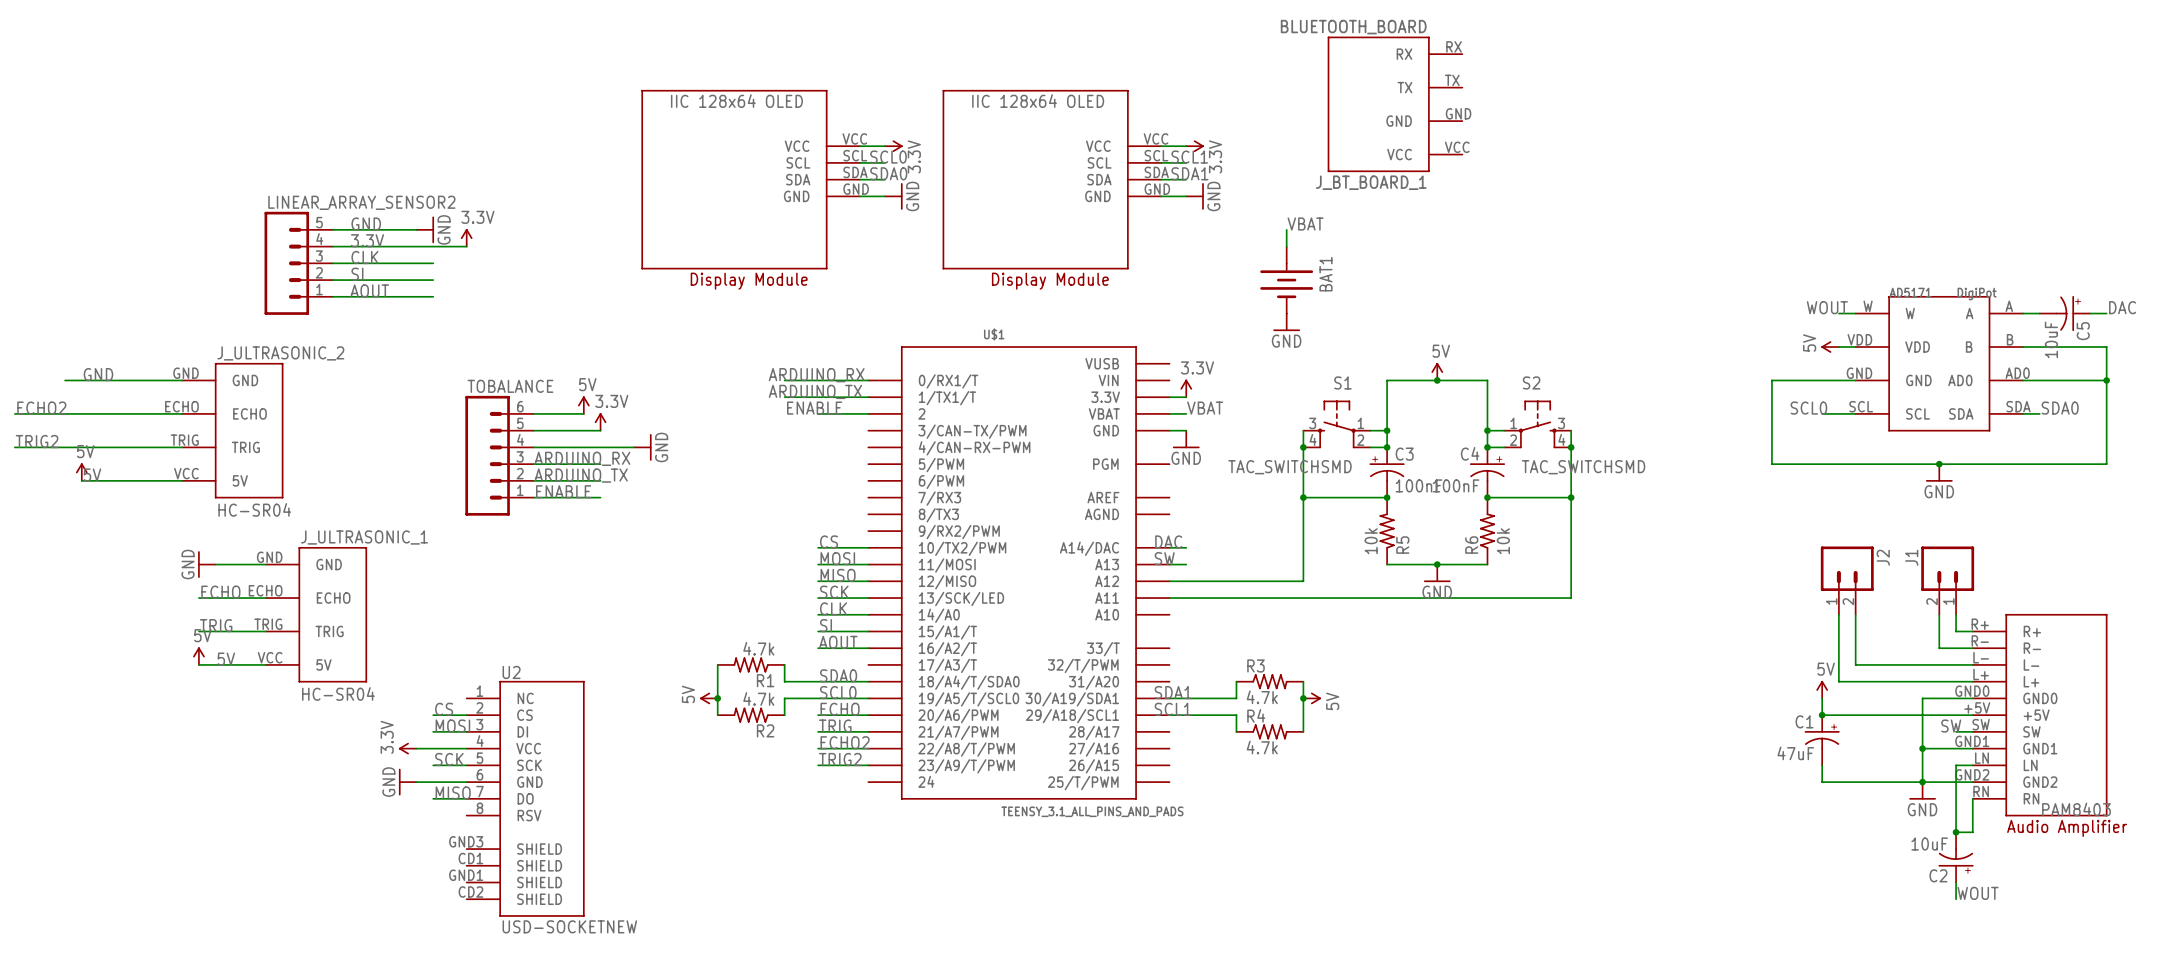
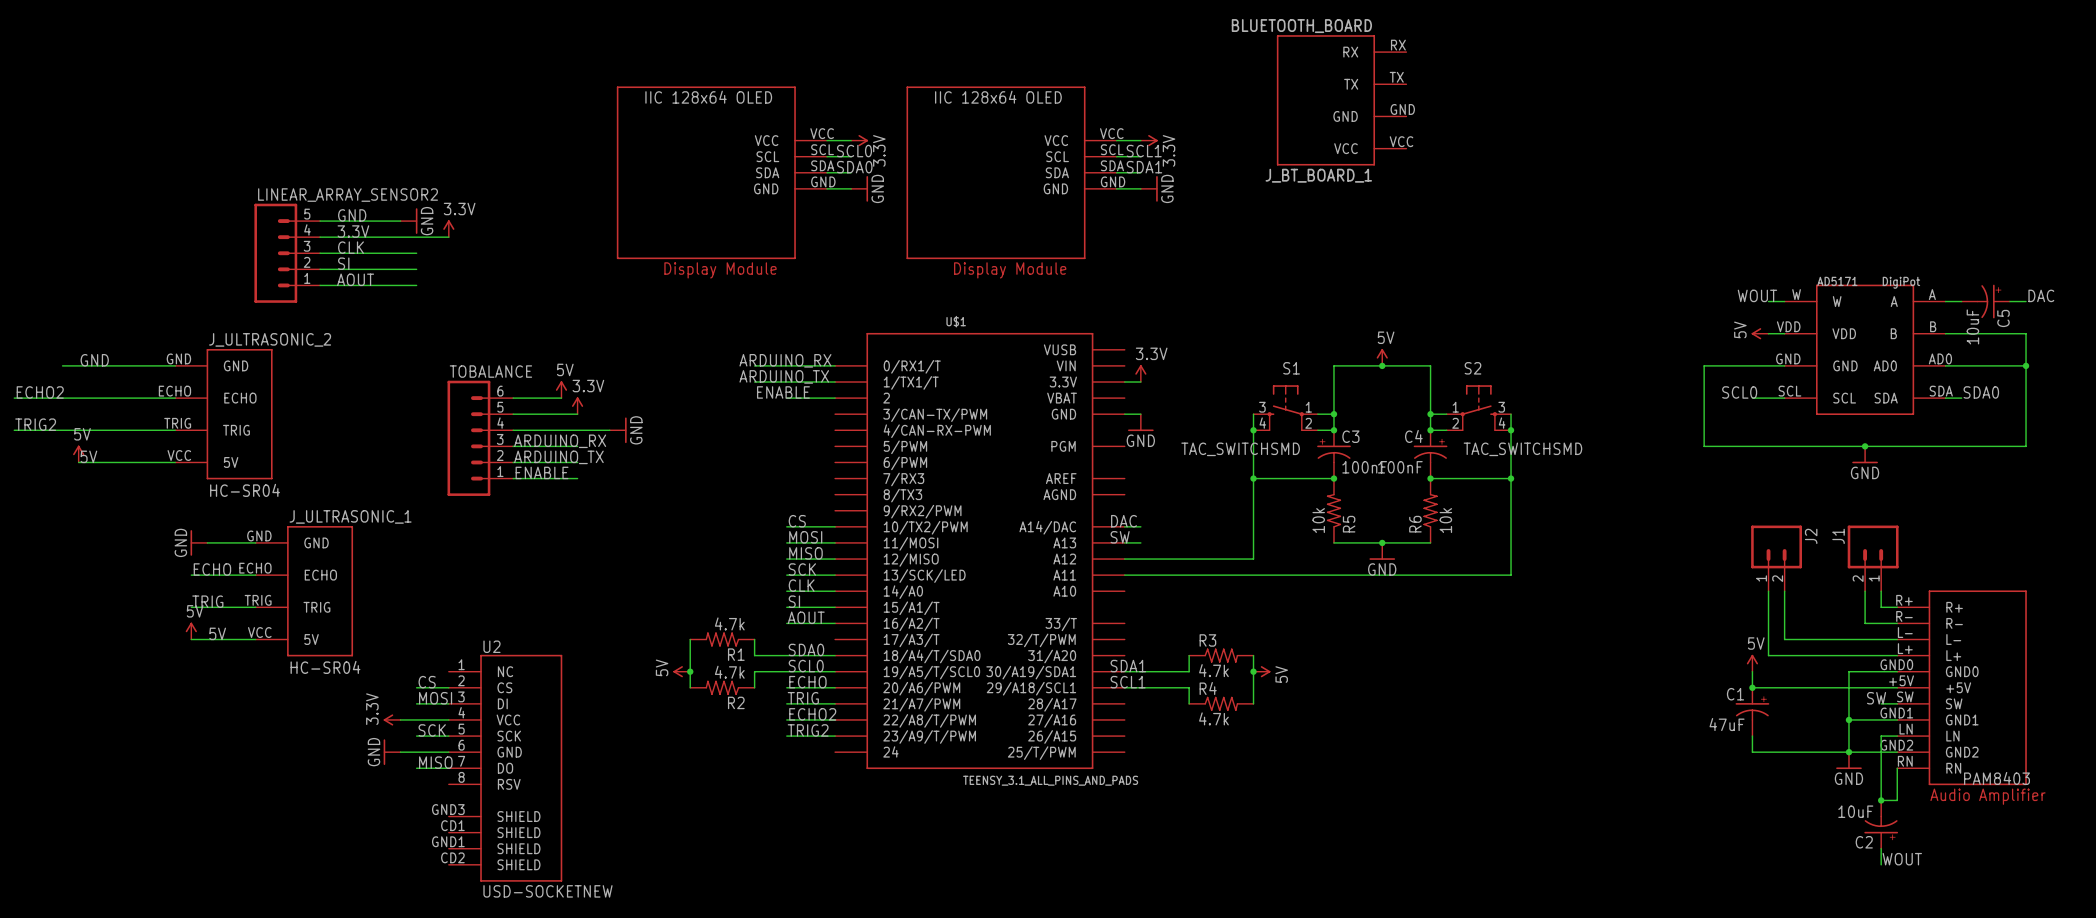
label: VBAT (1305, 224) -> none
wire: (1286, 229) (1286, 246) -> none
BAT1: (1286, 280) -> none
power symbol: GND (1286, 322) -> none
label: VBAT (1205, 408) -> none
wire: (1169, 413) (1186, 413) -> none

